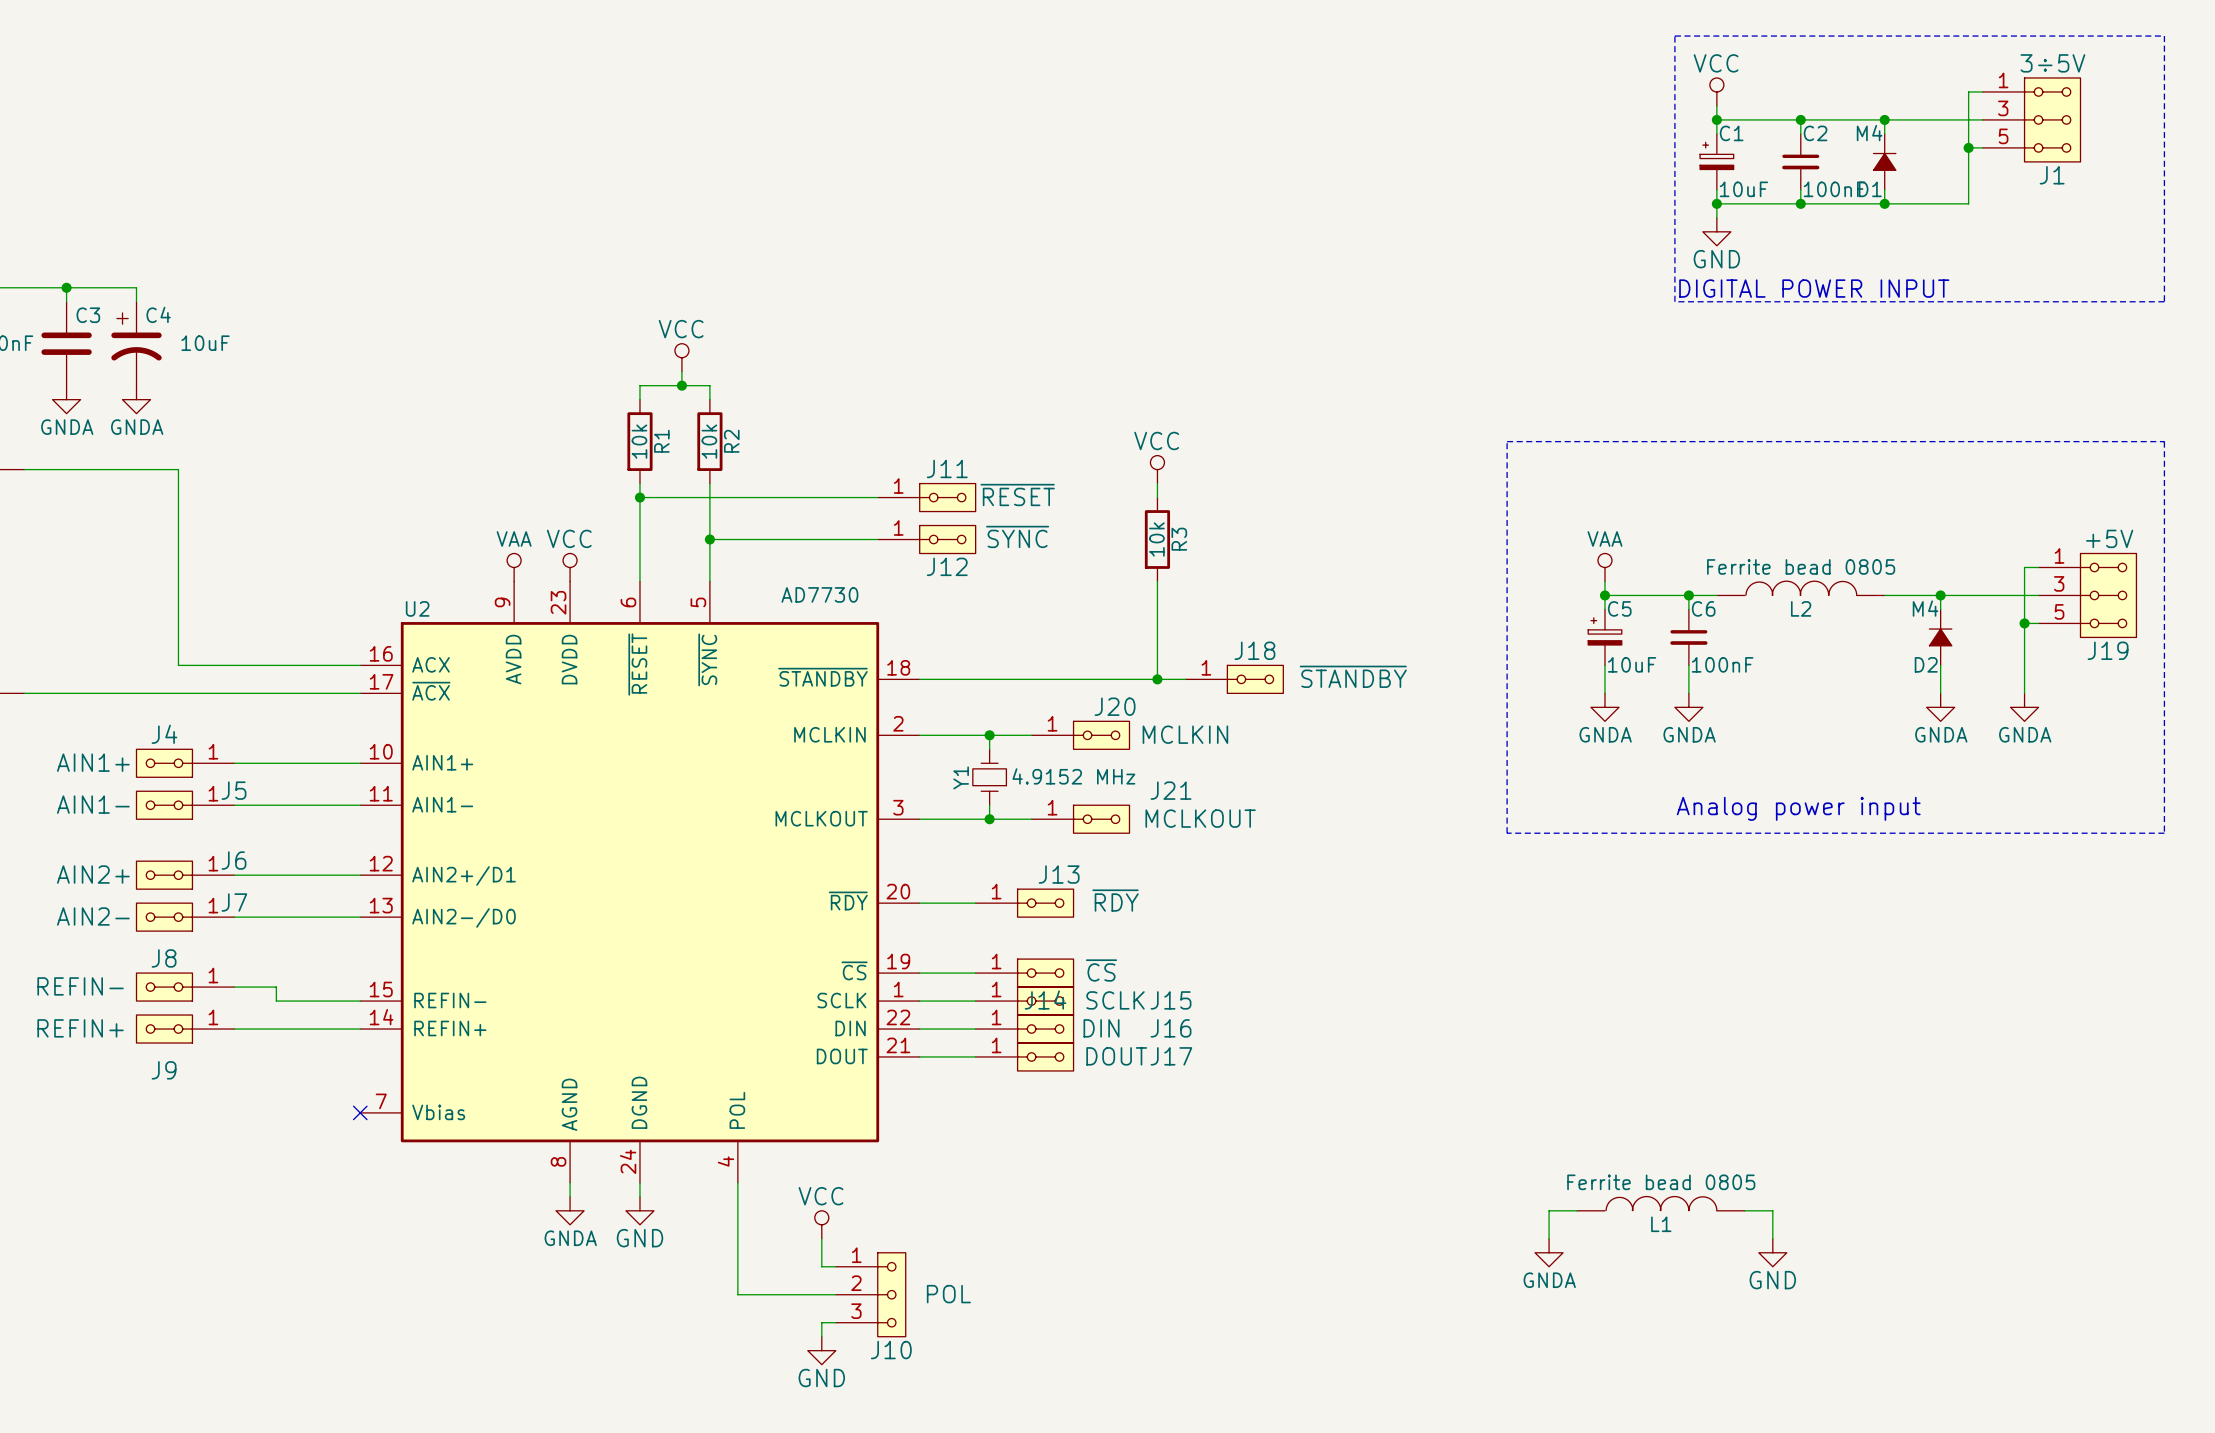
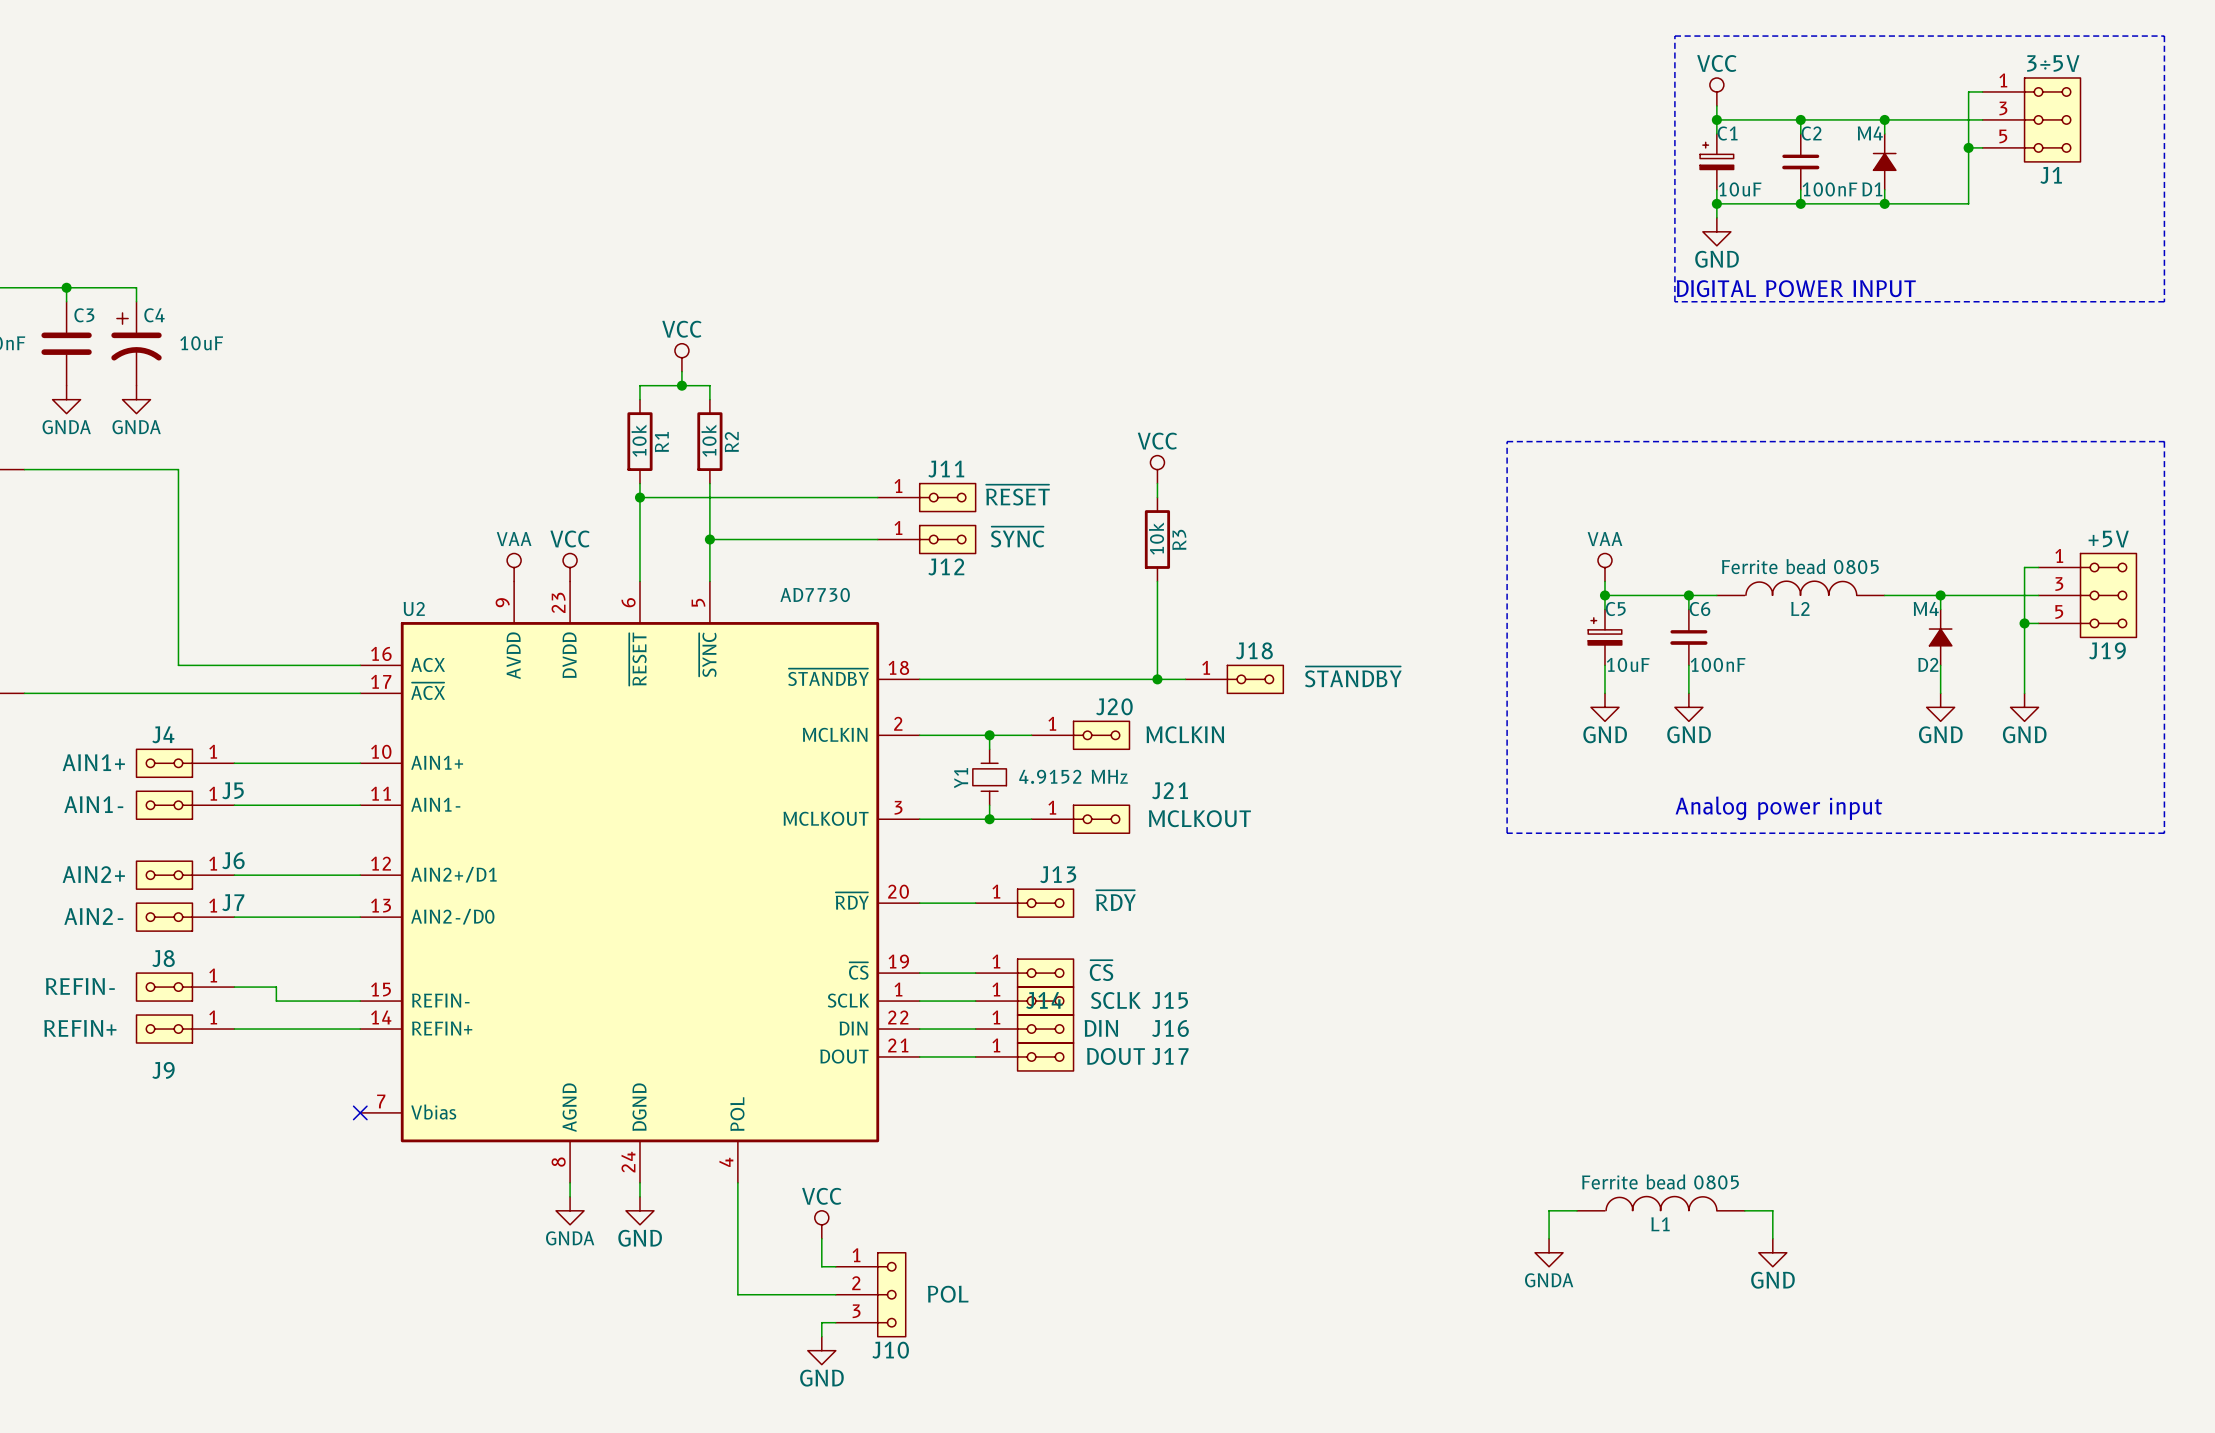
power symbol: GNDA (1604, 707) -> GND (1604, 707)
power symbol: GNDA (1688, 707) -> GND (1688, 707)
power symbol: GNDA (1940, 707) -> GND (1940, 707)
power symbol: GNDA (2024, 707) -> GND (2024, 707)

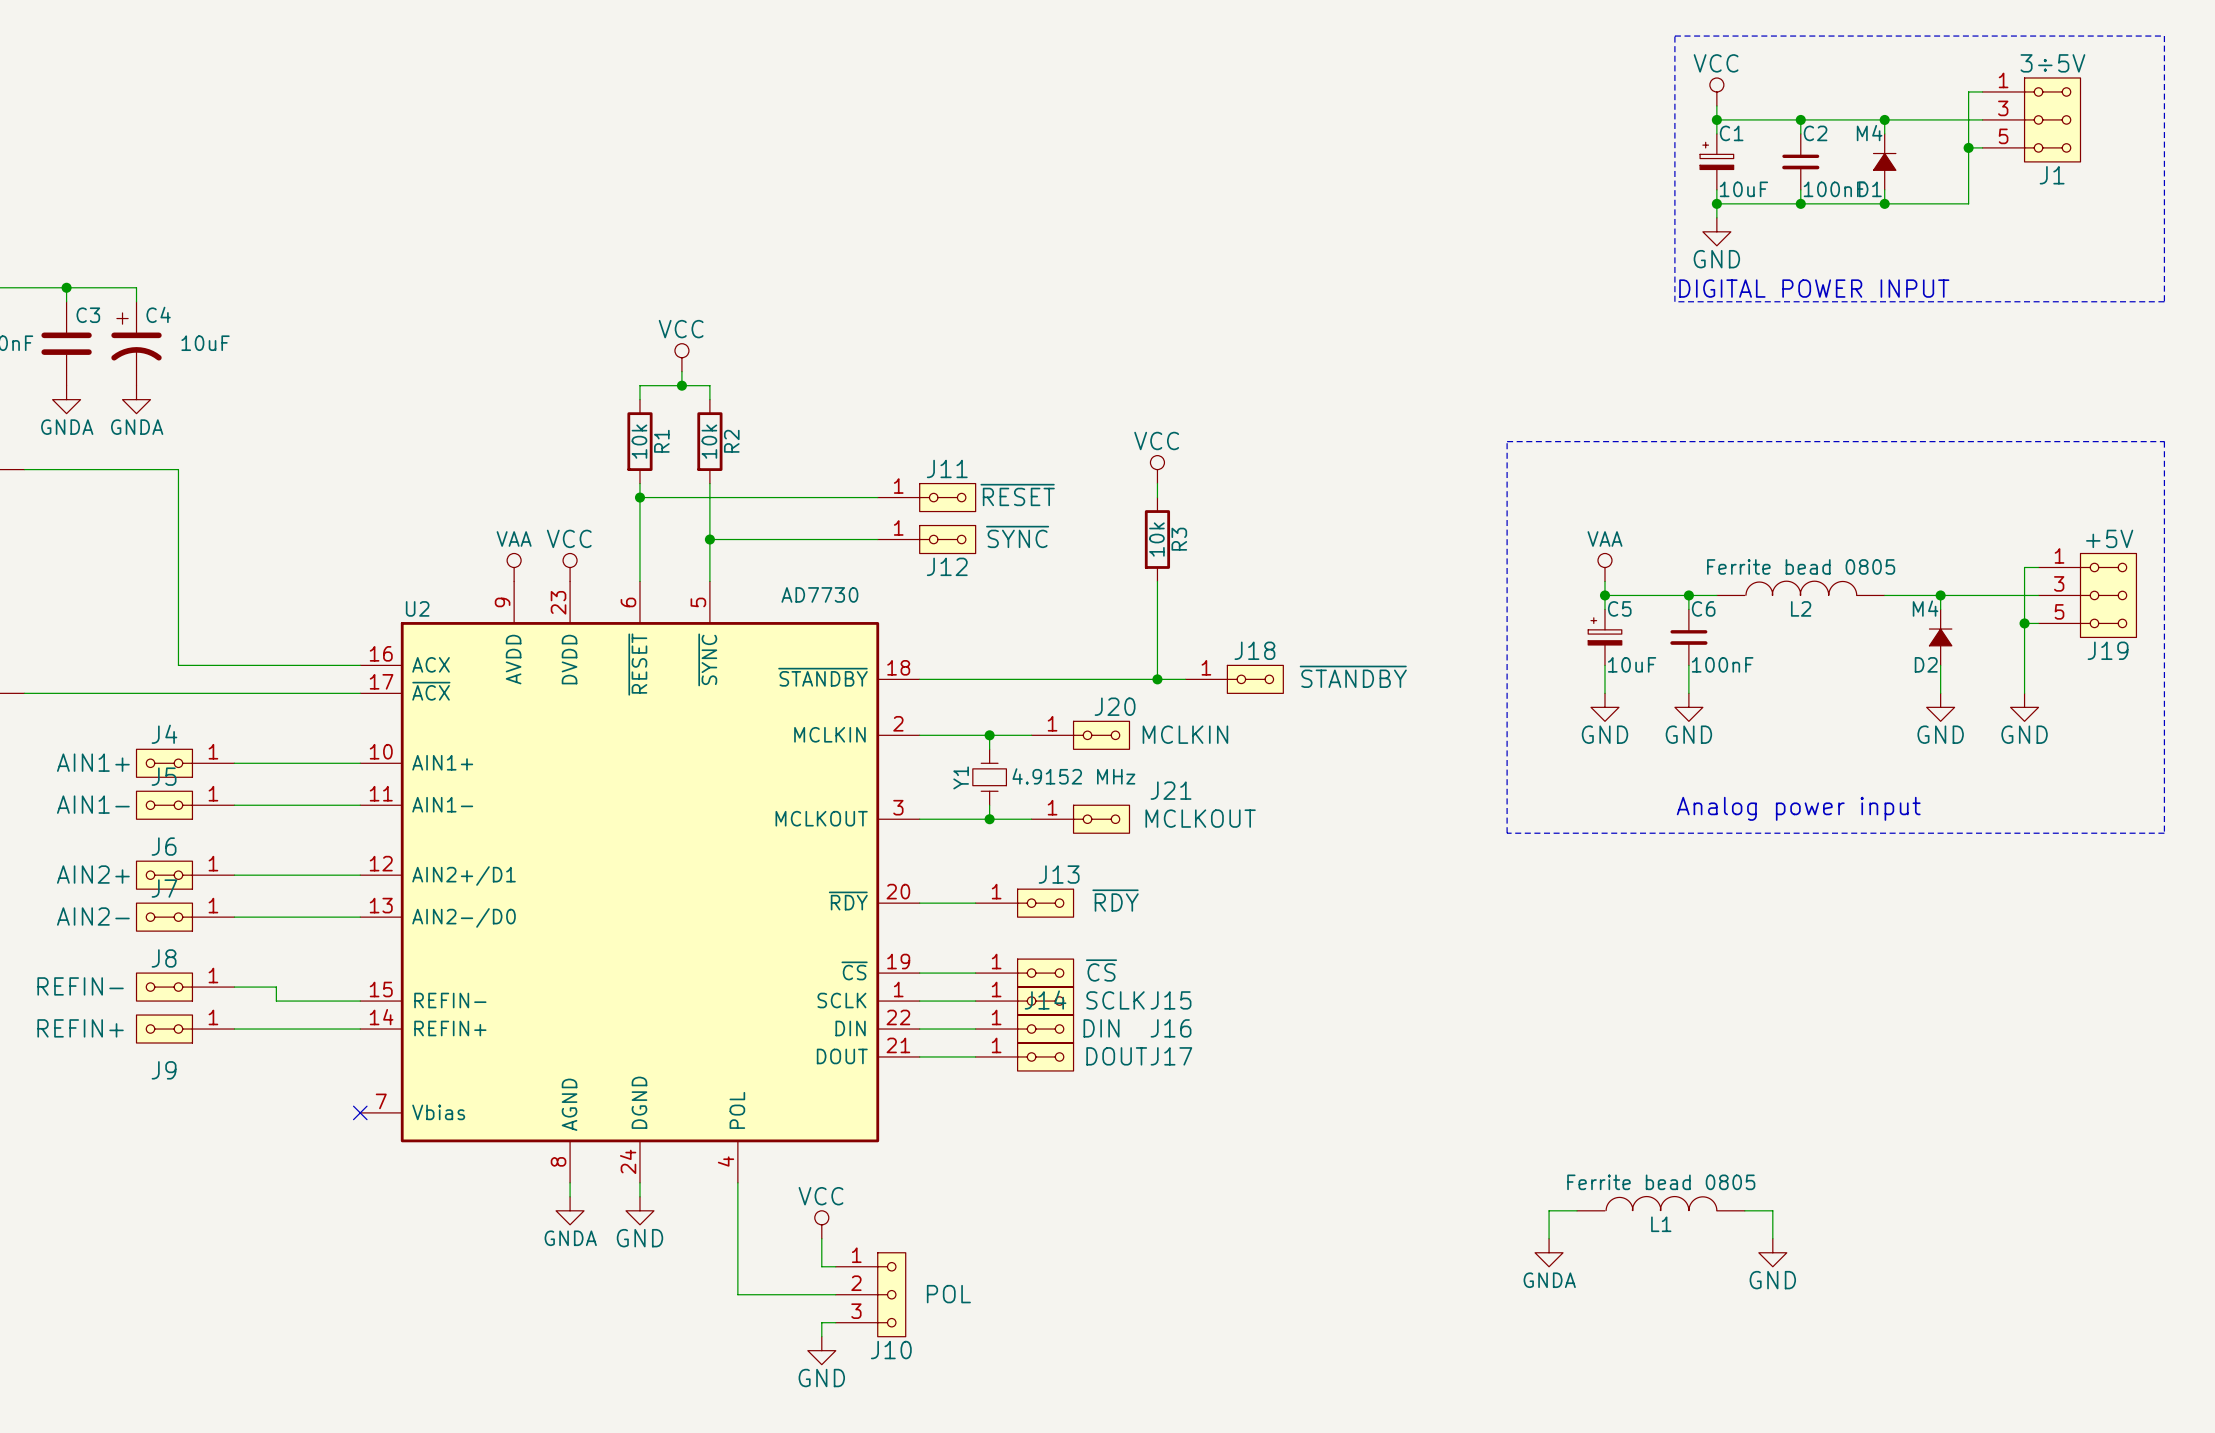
J5 name position: J5 (233, 790) -> J5 (164, 776)
J6 name position: J6 (233, 860) -> J6 (164, 846)
J7 name position: J7 (233, 902) -> J7 (164, 888)

